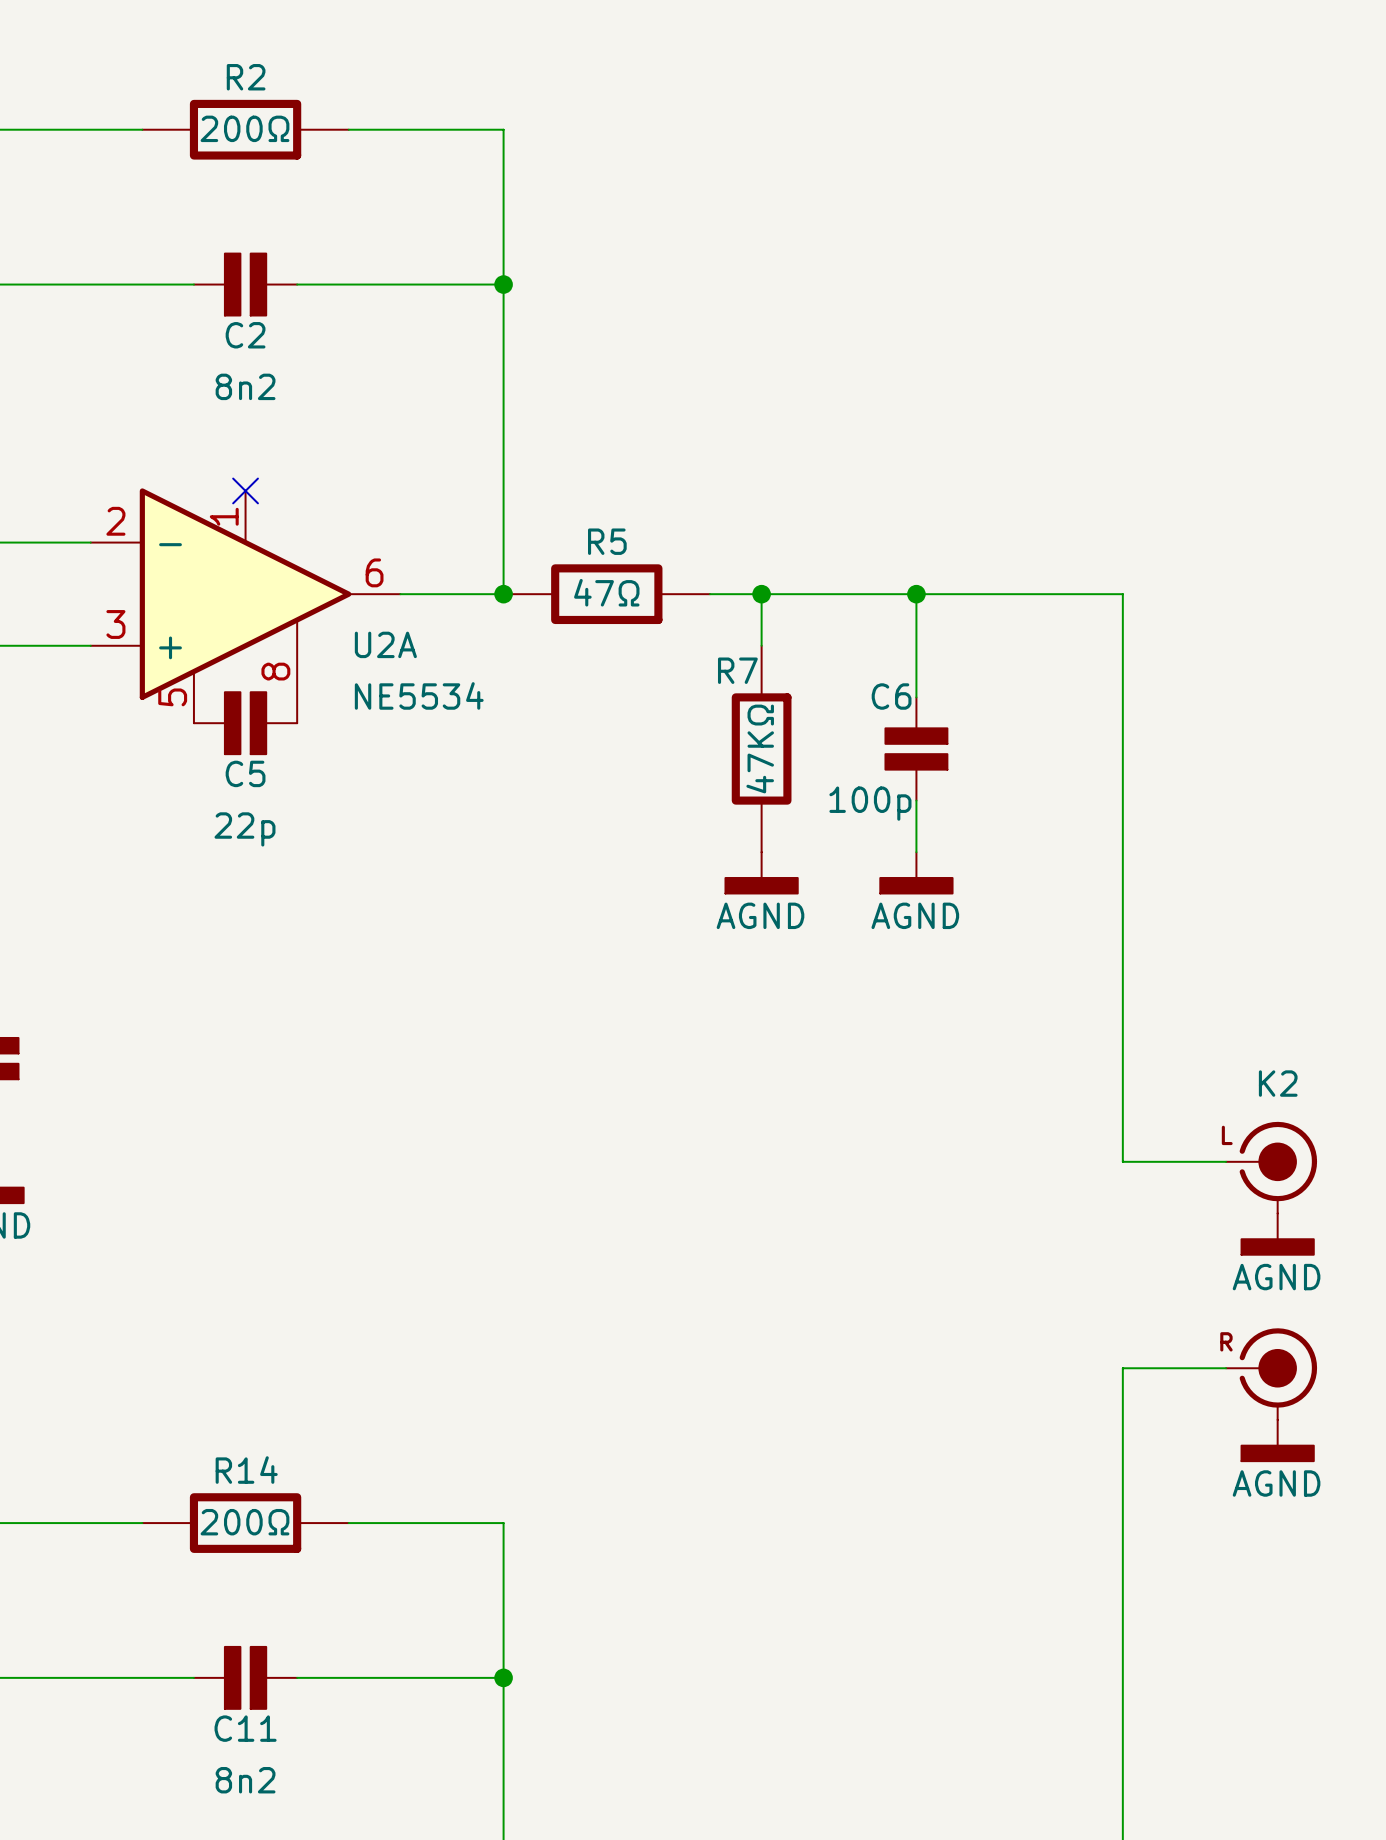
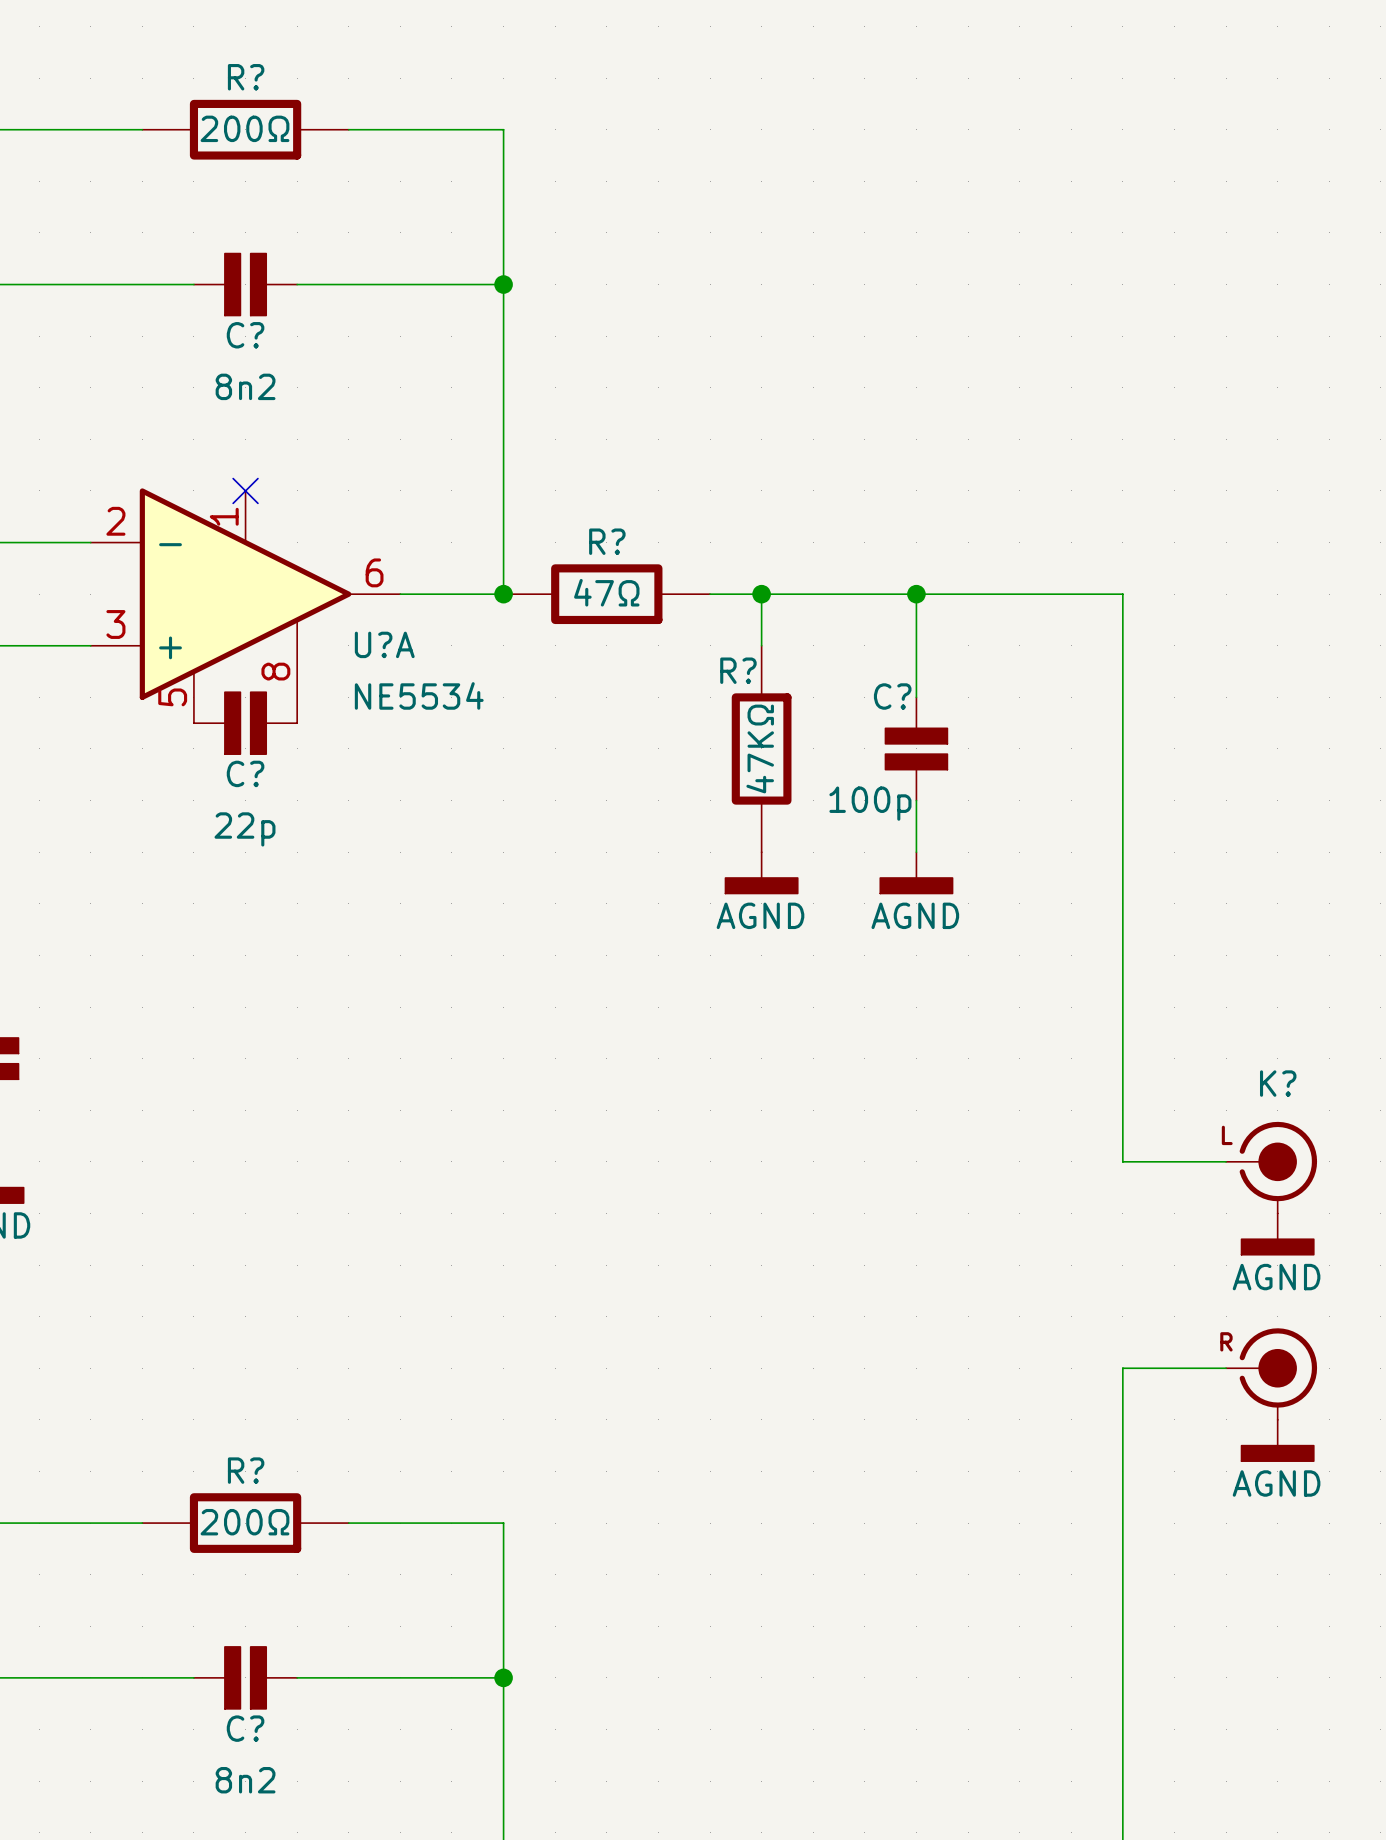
R2 name: R2 (246, 77) -> R? (246, 77)
C2 name: C2 (245, 335) -> C? (245, 335)
R5 name: R5 (607, 541) -> R? (607, 541)
U2A name: U2A (385, 644) -> U?A (384, 644)
R7 name: R7 (737, 670) -> R? (738, 670)
C6 name: C6 (891, 696) -> C? (892, 696)
C5 name: C5 (245, 773) -> C? (245, 773)
K2 name: K2 (1278, 1083) -> K? (1278, 1083)
R14 name: R14 (246, 1470) -> R? (246, 1470)
C11 name: C11 (245, 1728) -> C? (245, 1728)

